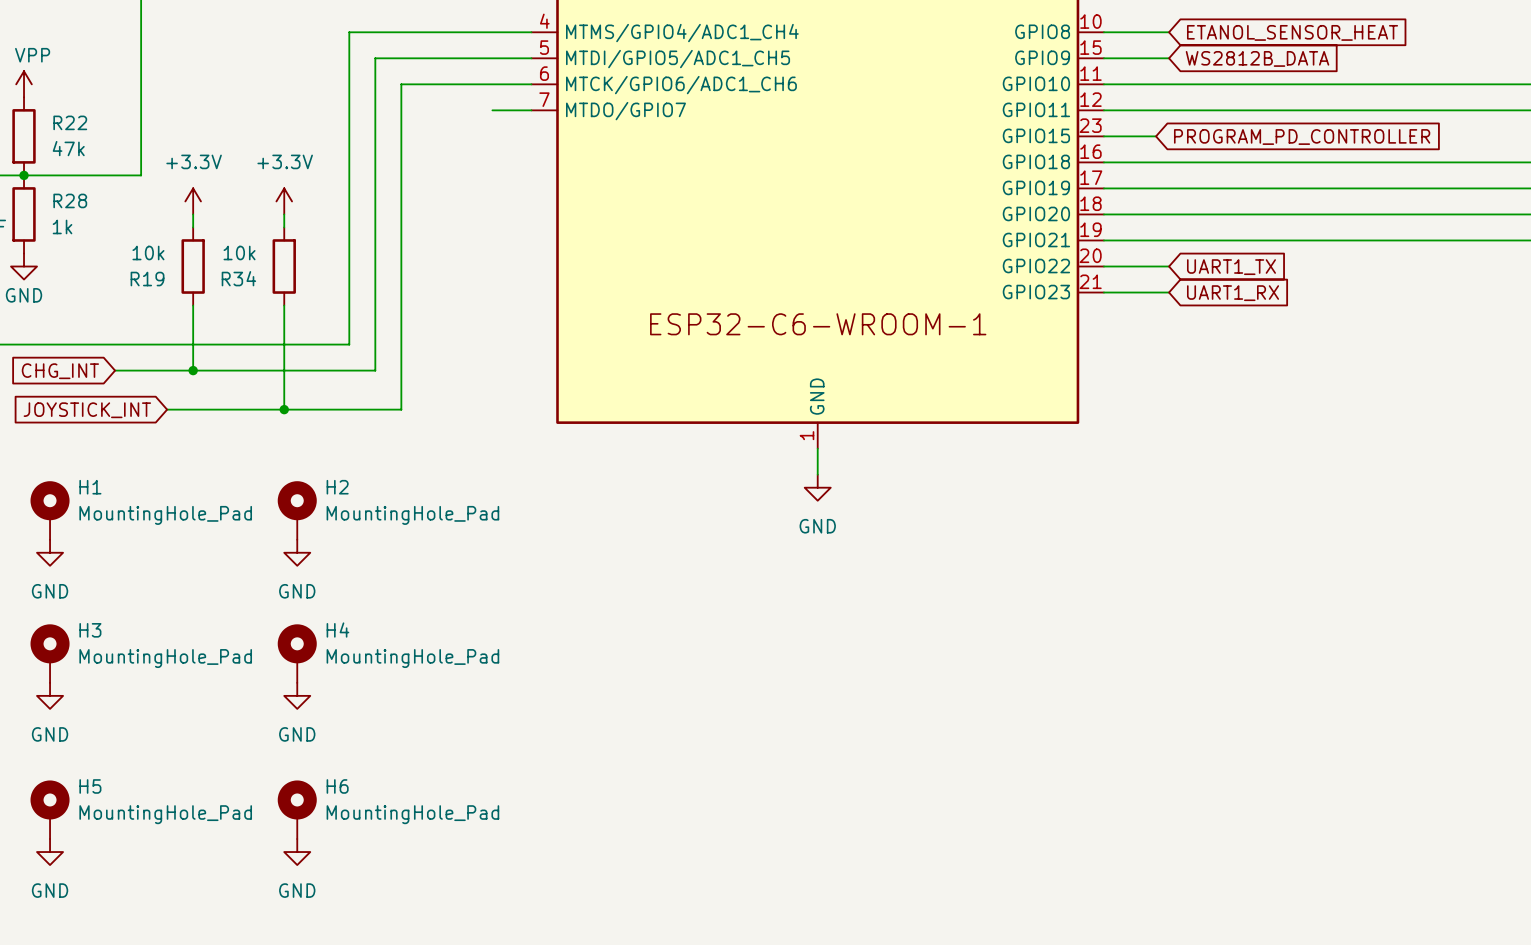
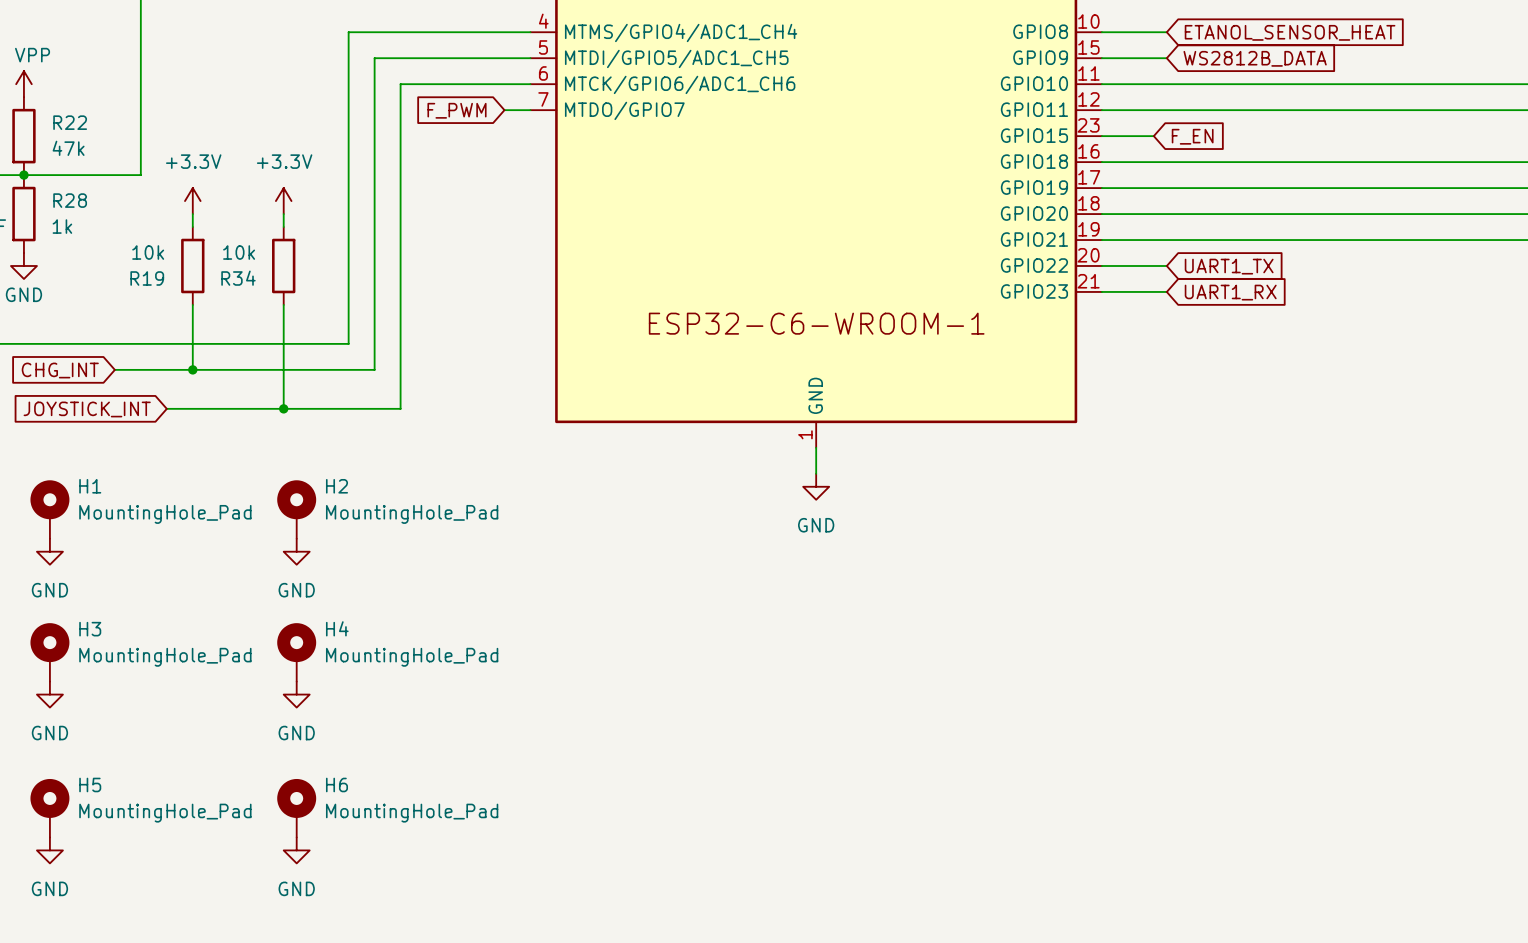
global label: none -> F_PWM (457, 110)
wire: (492, 110) (505, 110) -> none
global label: PROGRAM_PD_CONTROLLER (1302, 137) -> F_EN (1192, 136)

